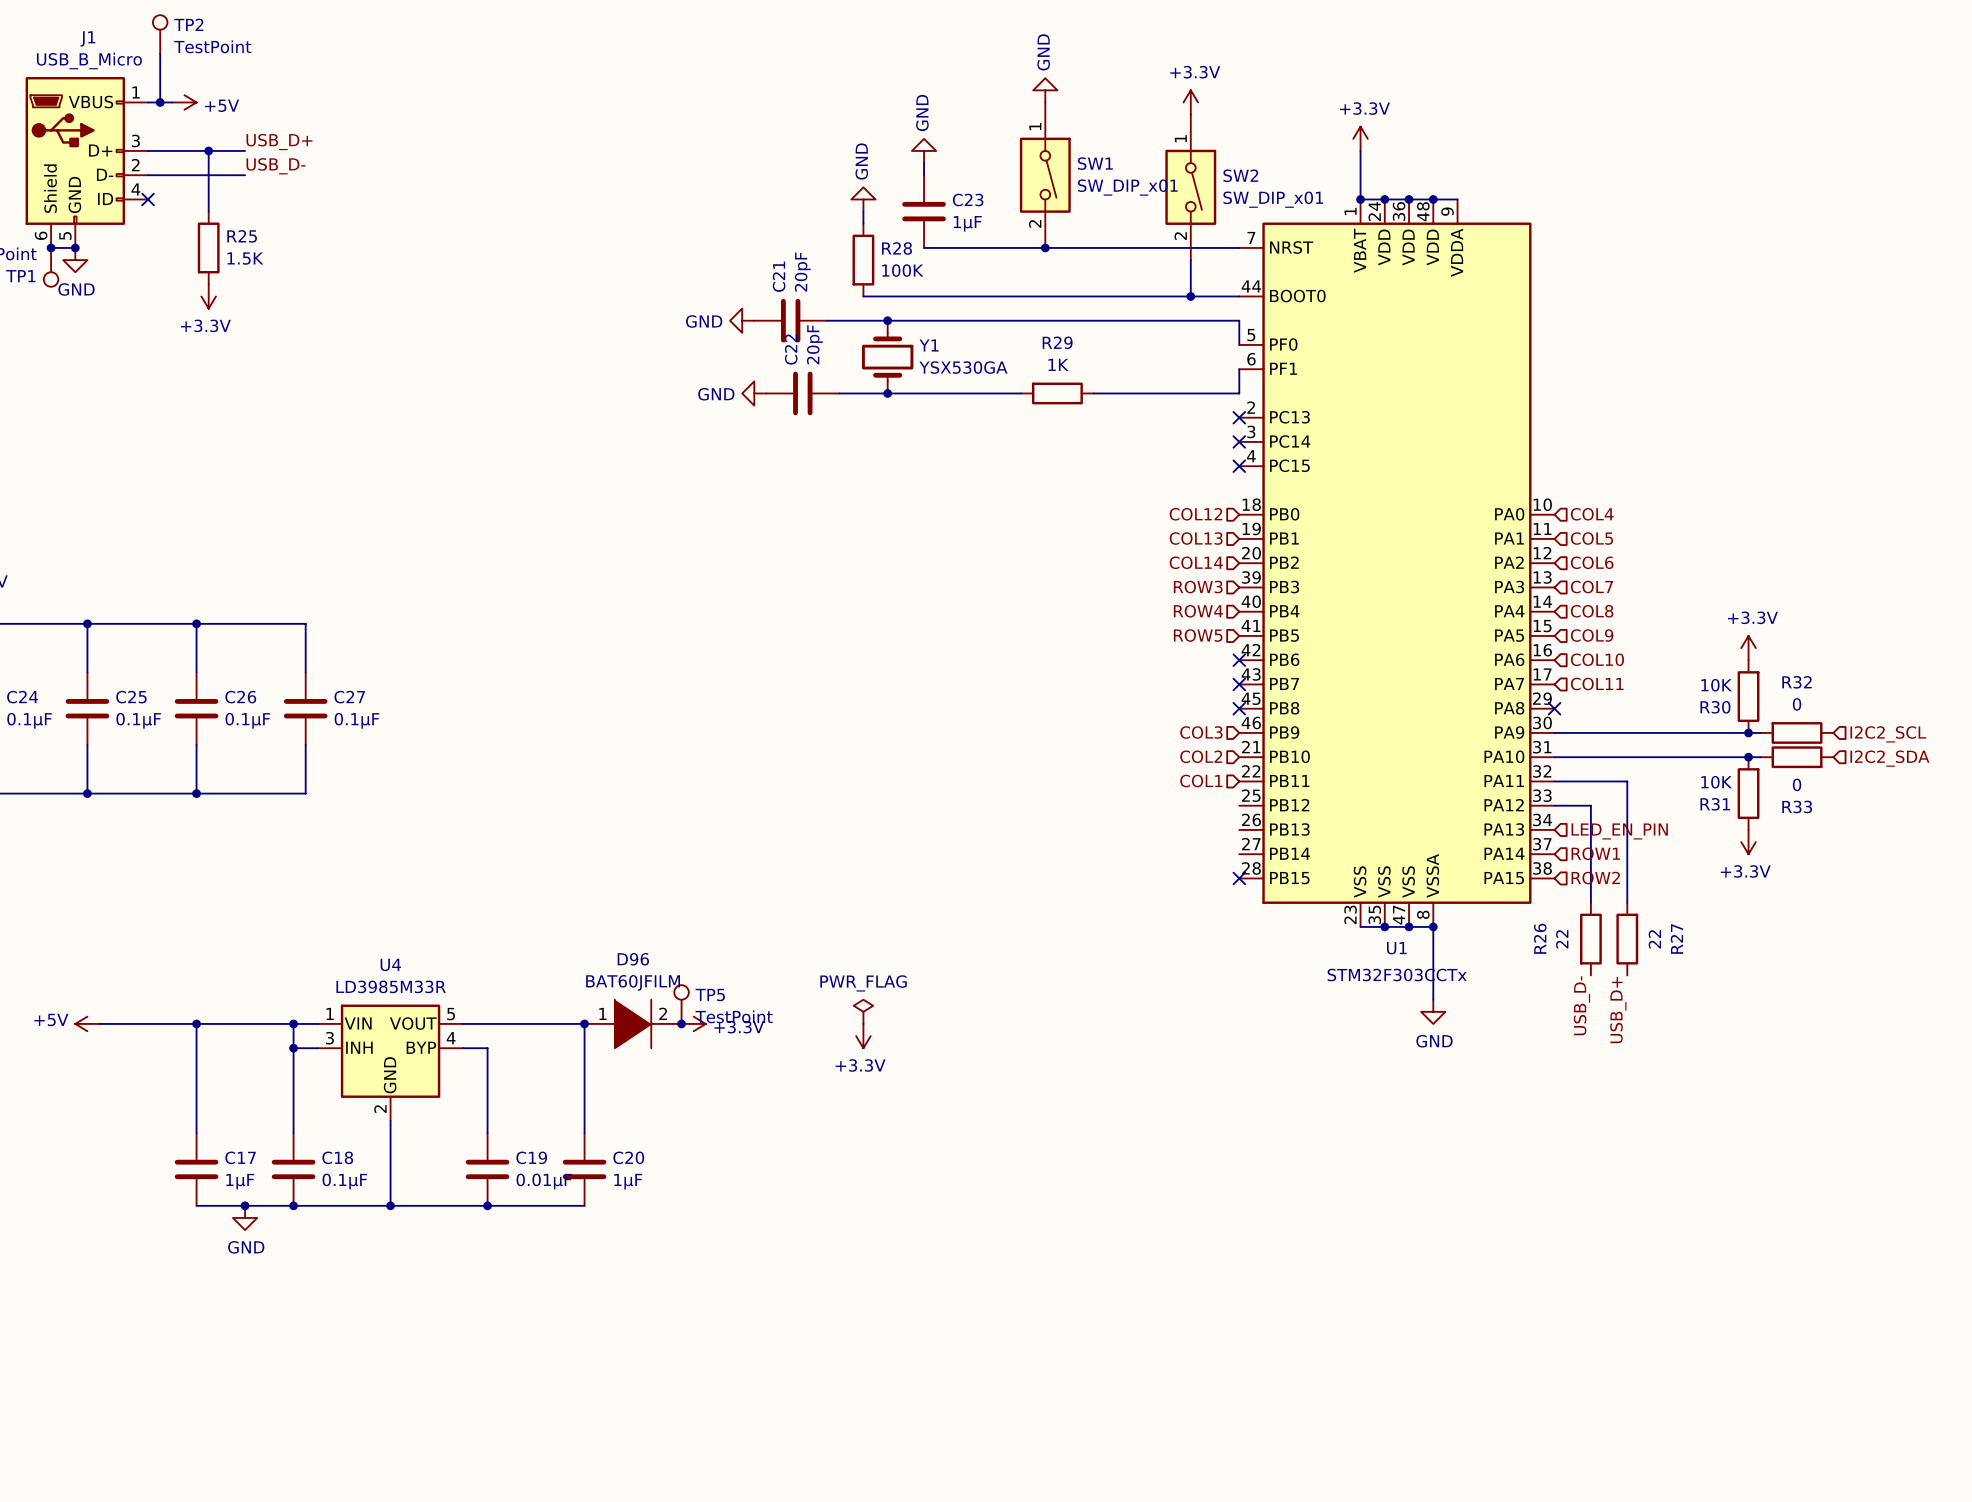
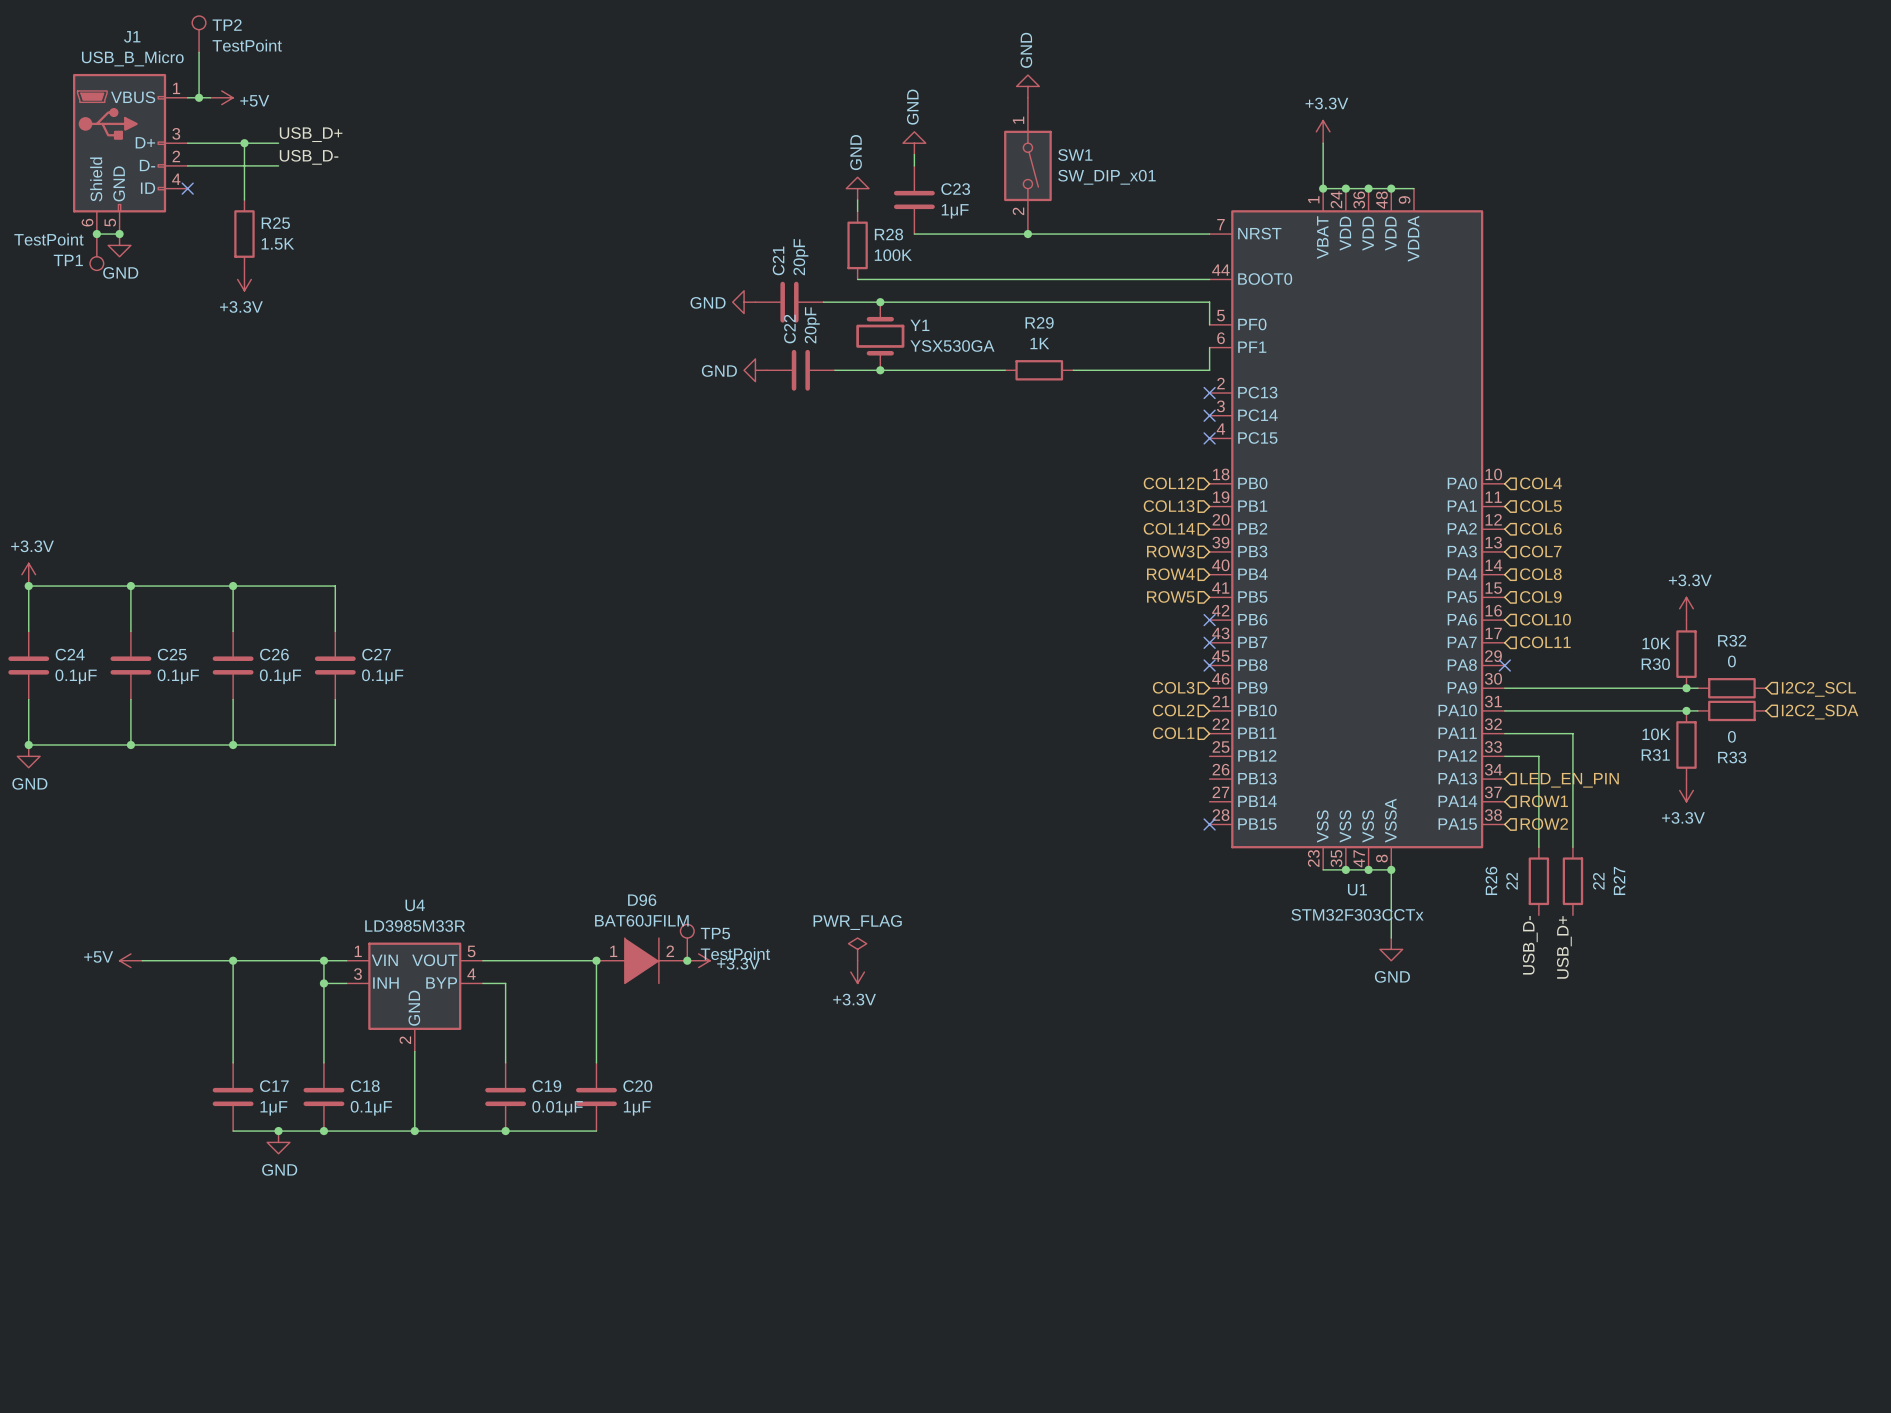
power symbol: +3.3V (1190, 102) -> none
SW2: SW_DIP_x01 (1190, 187) -> none
wire: (1190, 260) (1190, 296) -> none
junction: (1190, 296) -> none

